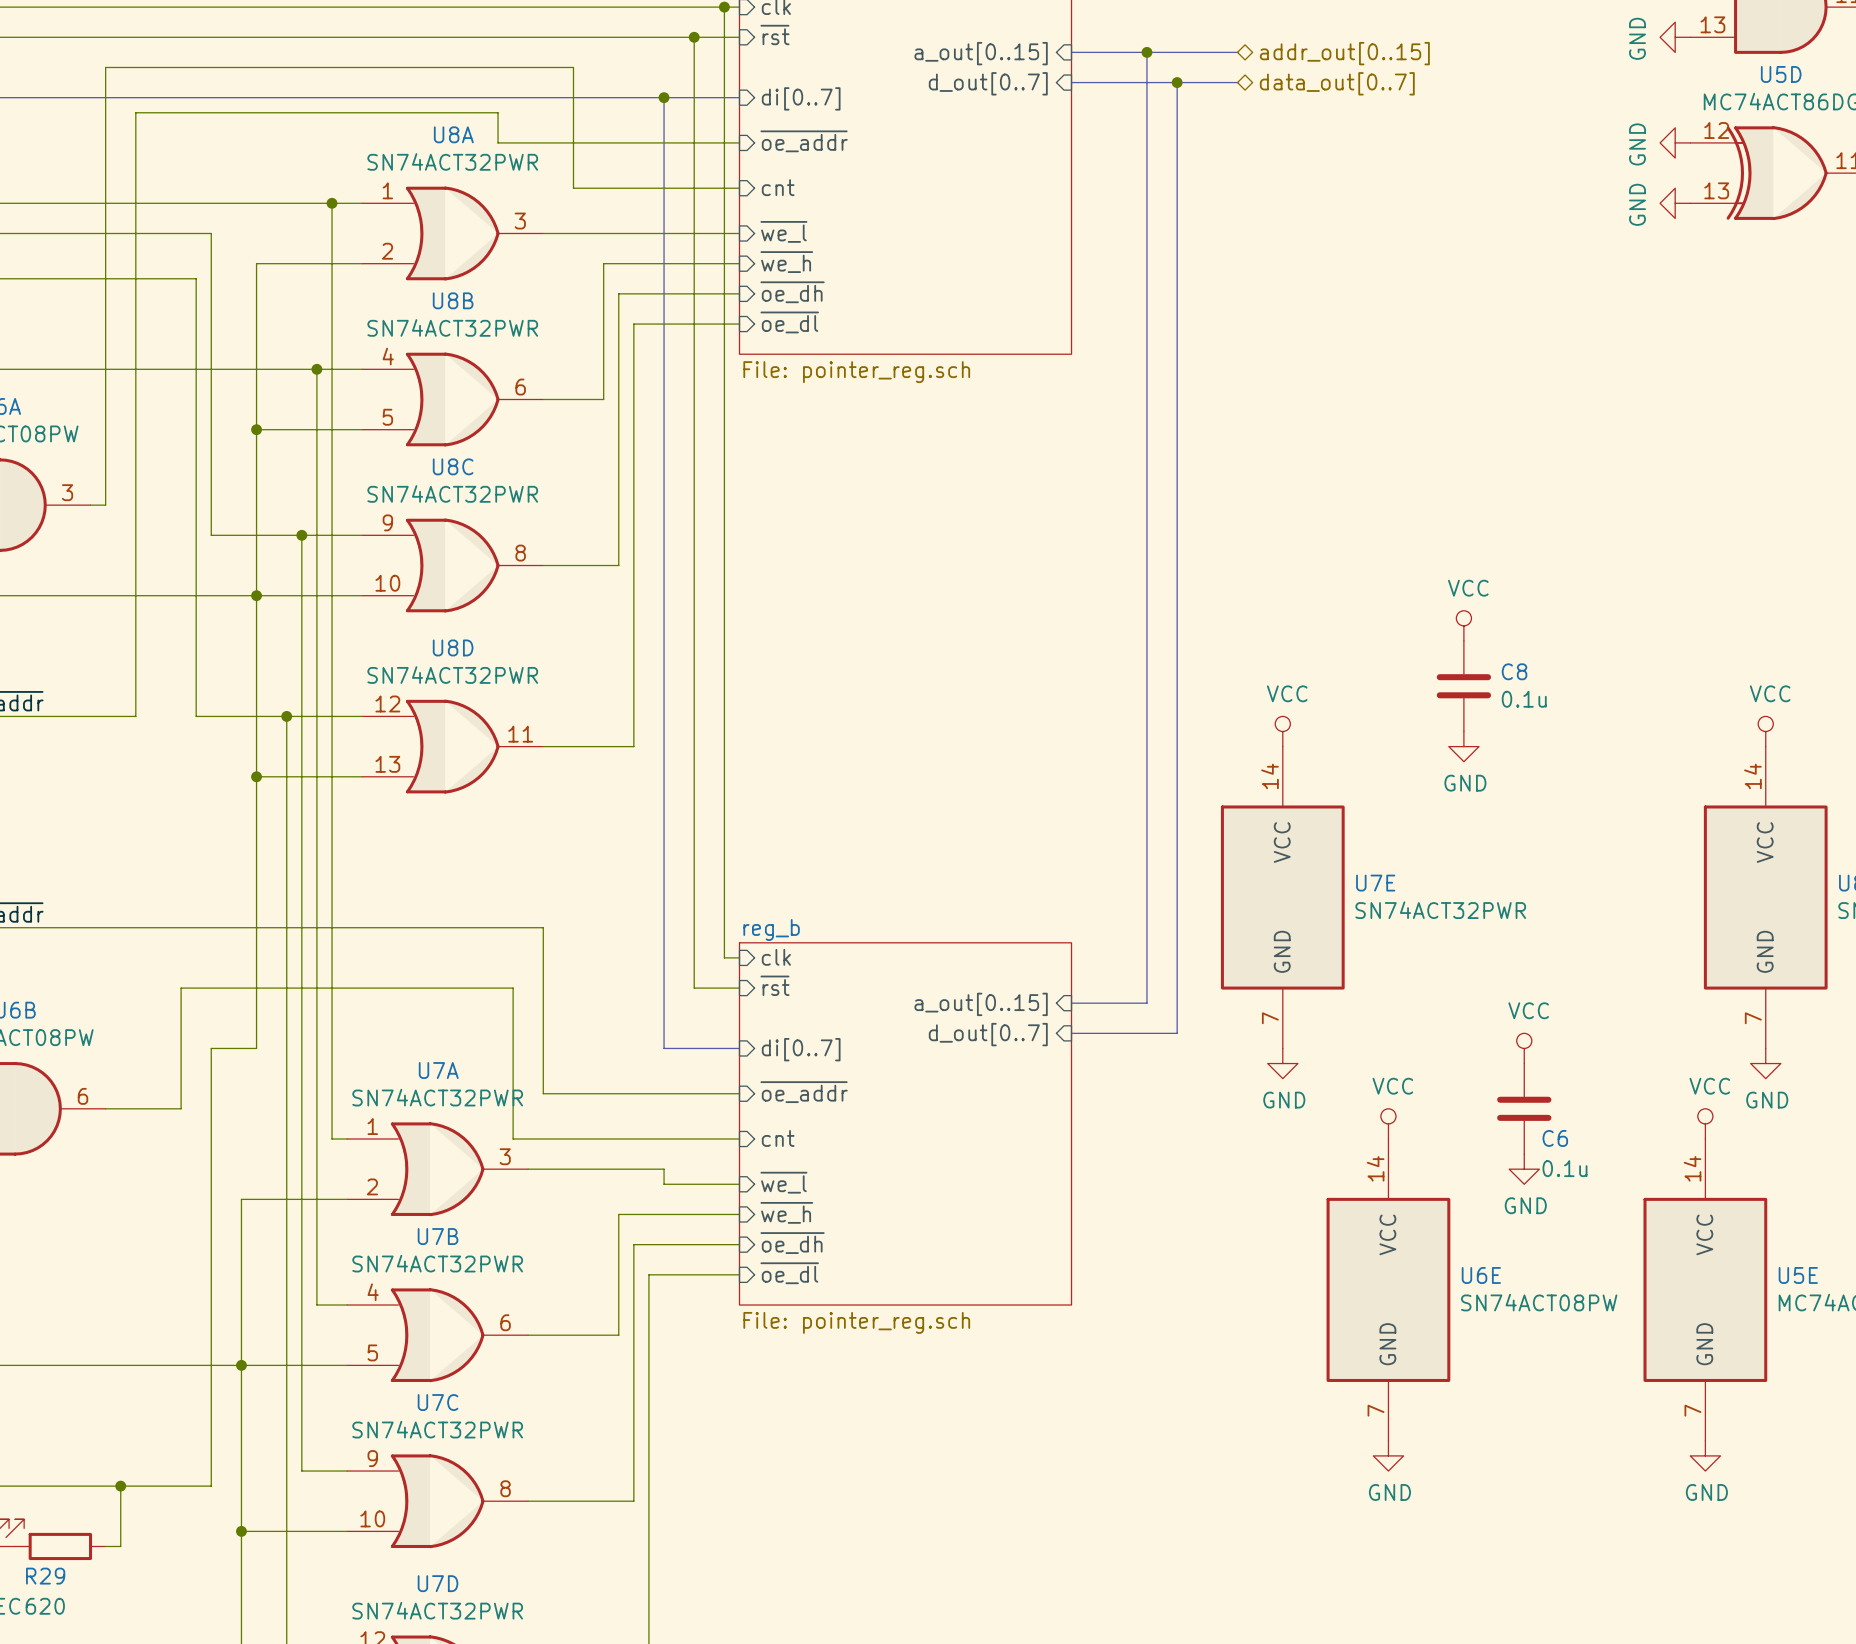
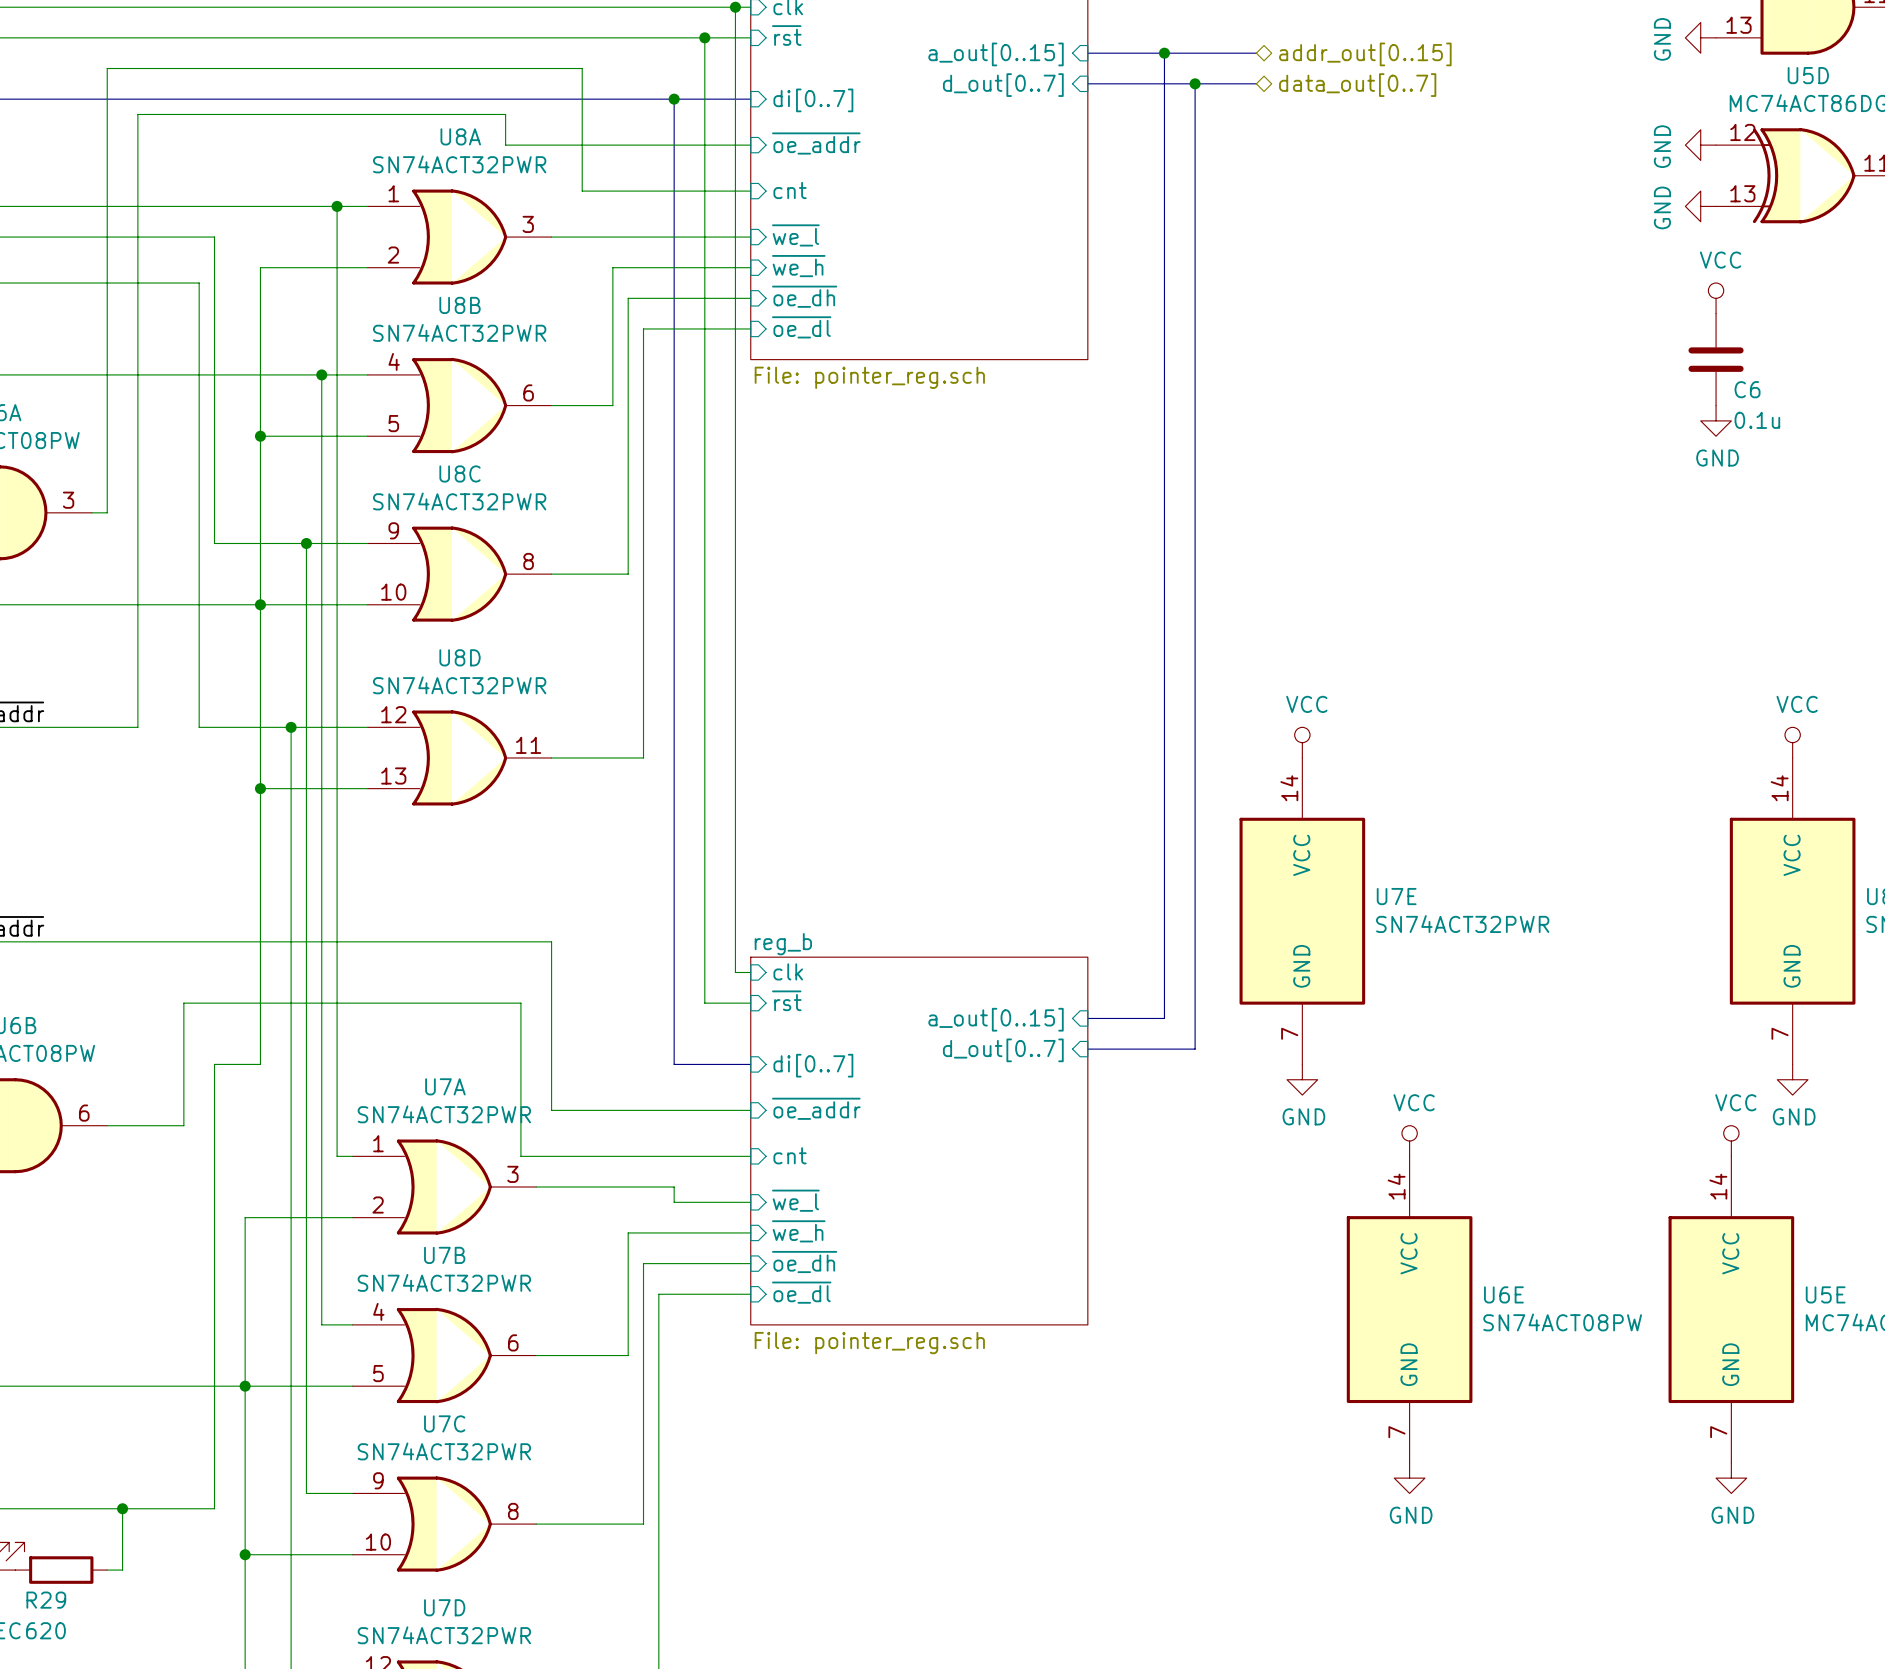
power symbol: none -> VCC (1716, 298)
power symbol: none -> GND (1716, 420)
power symbol: VCC (1463, 625) -> none
C8: 0.1u (1463, 686) -> none
power symbol: GND (1463, 746) -> none
power symbol: VCC (1524, 1048) -> none
C6 position: (1524, 1108) -> (1716, 359)
power symbol: GND (1524, 1169) -> none

